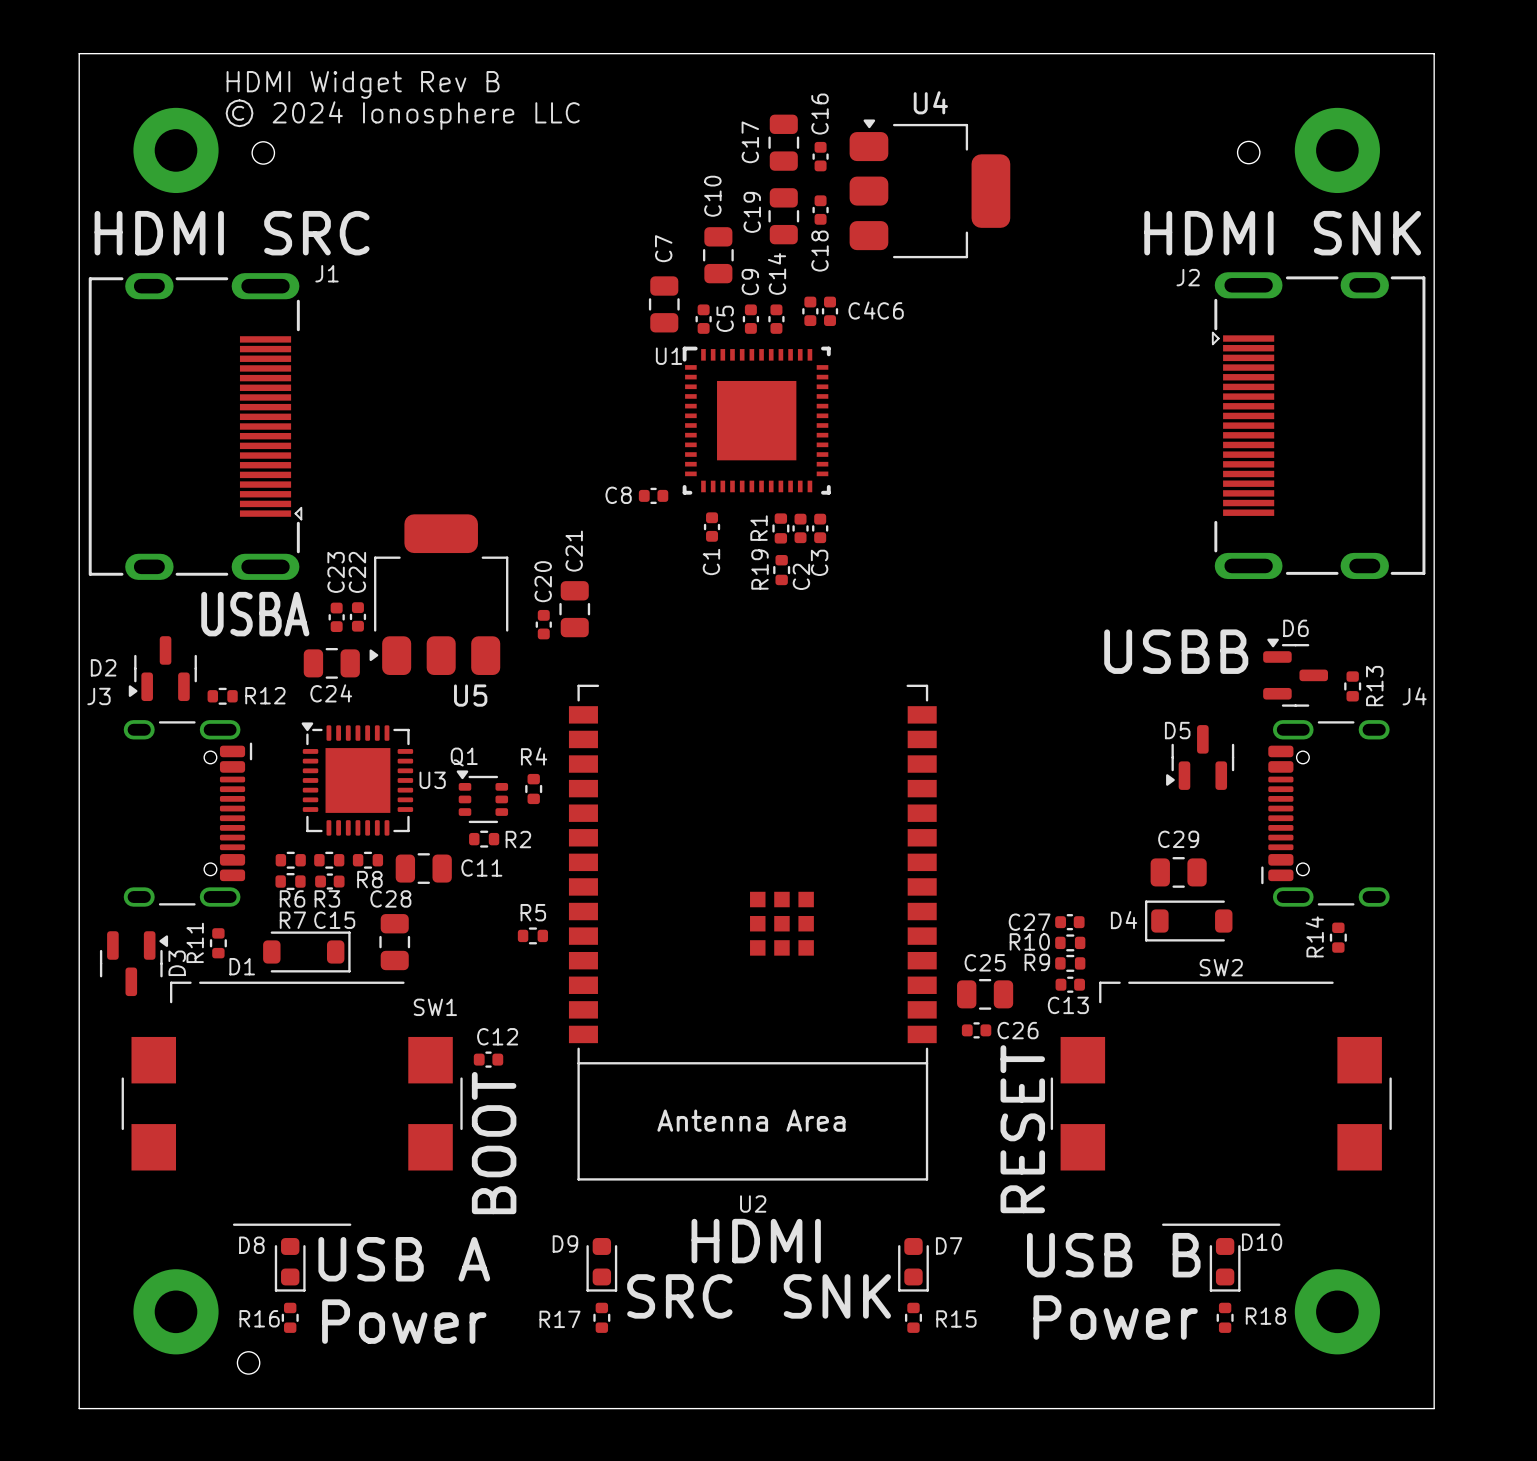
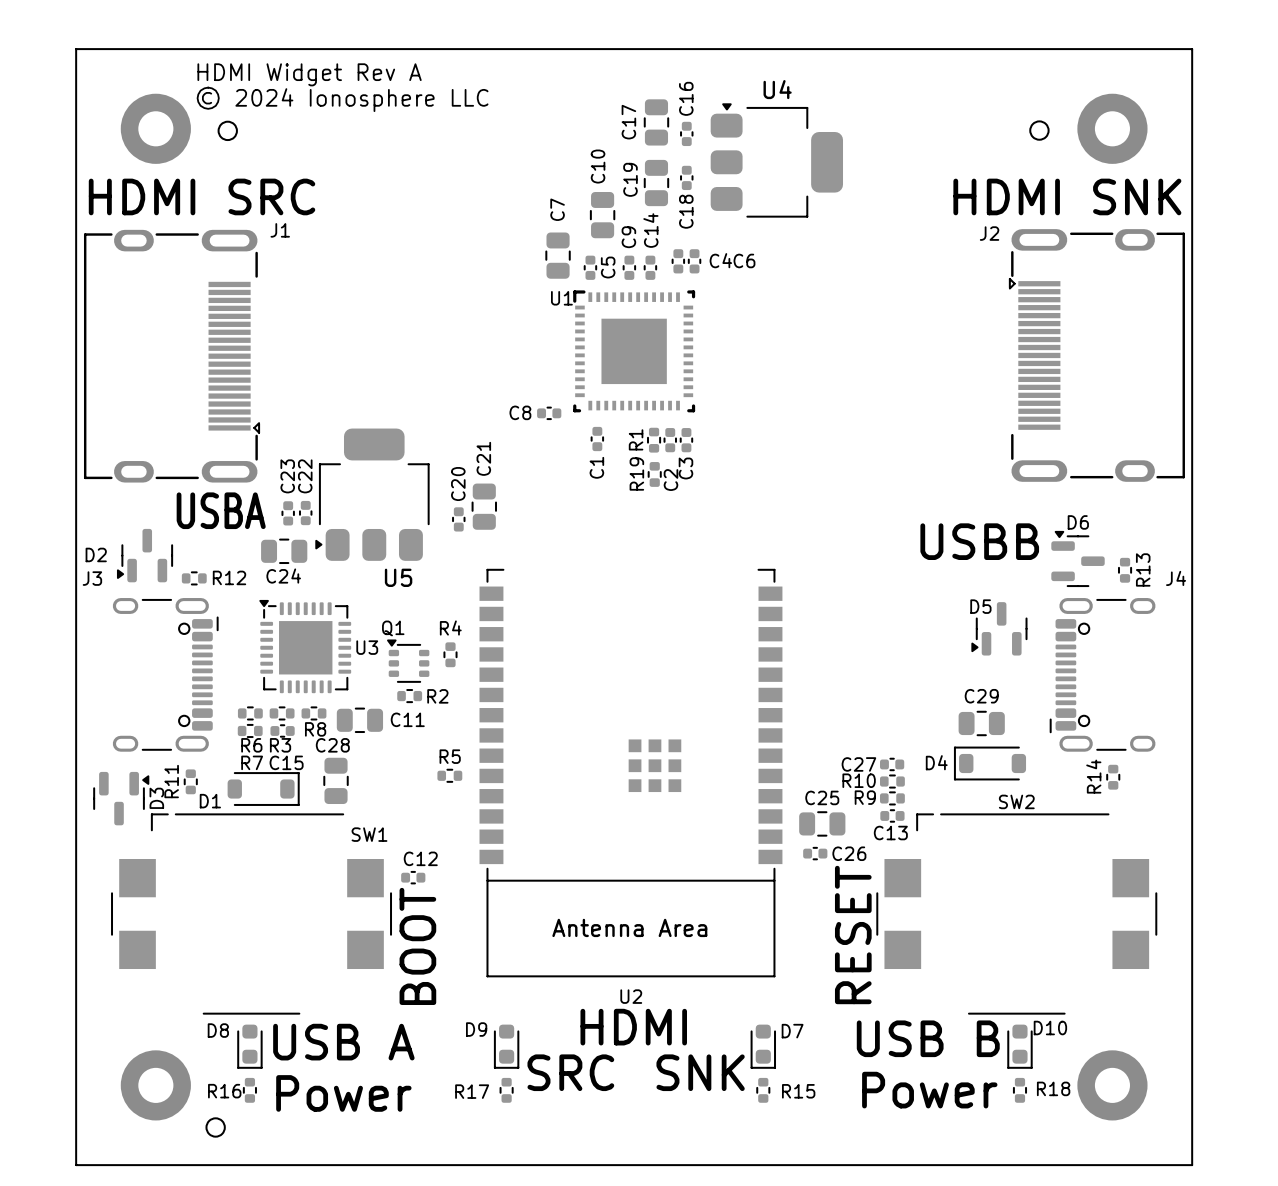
text: HDMI Widget Rev B (363, 84) -> HDMI Widget Rev A (309, 74)

